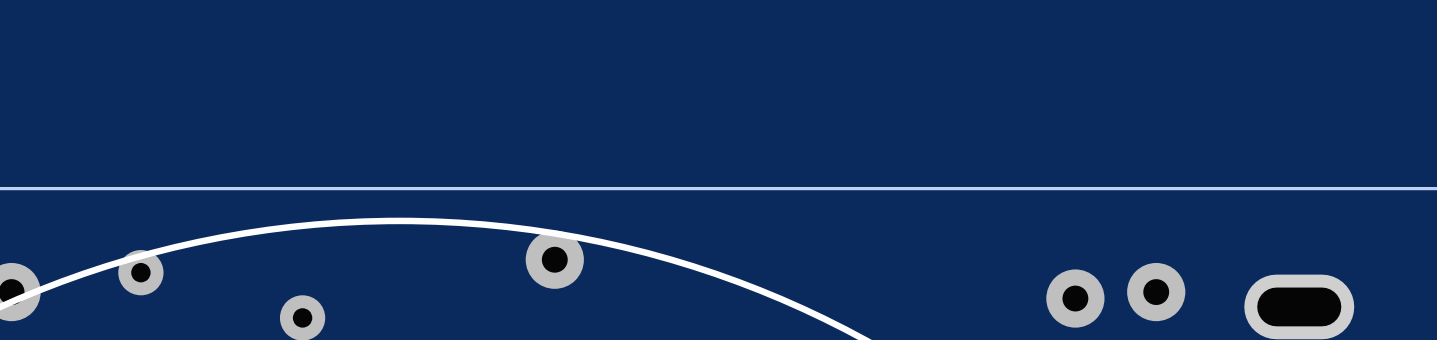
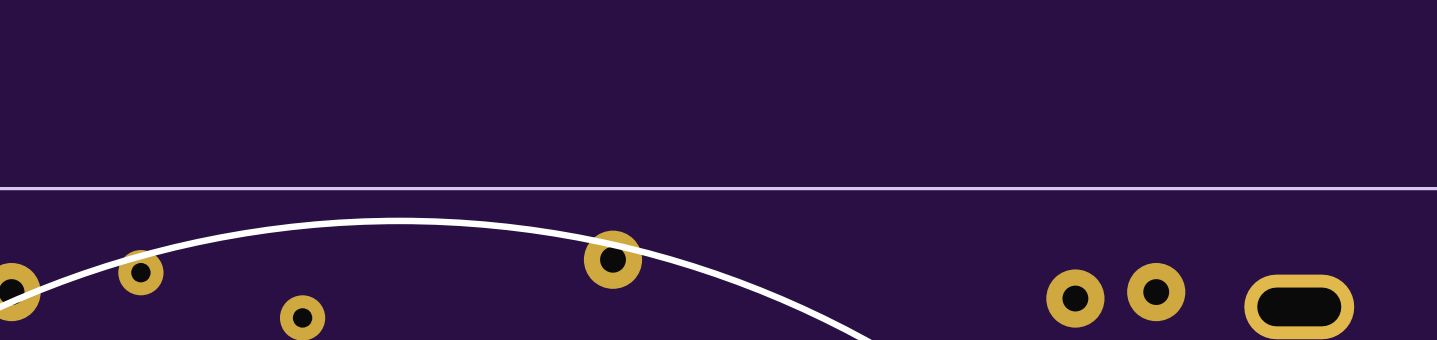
via position: (554, 259) -> (613, 259)

